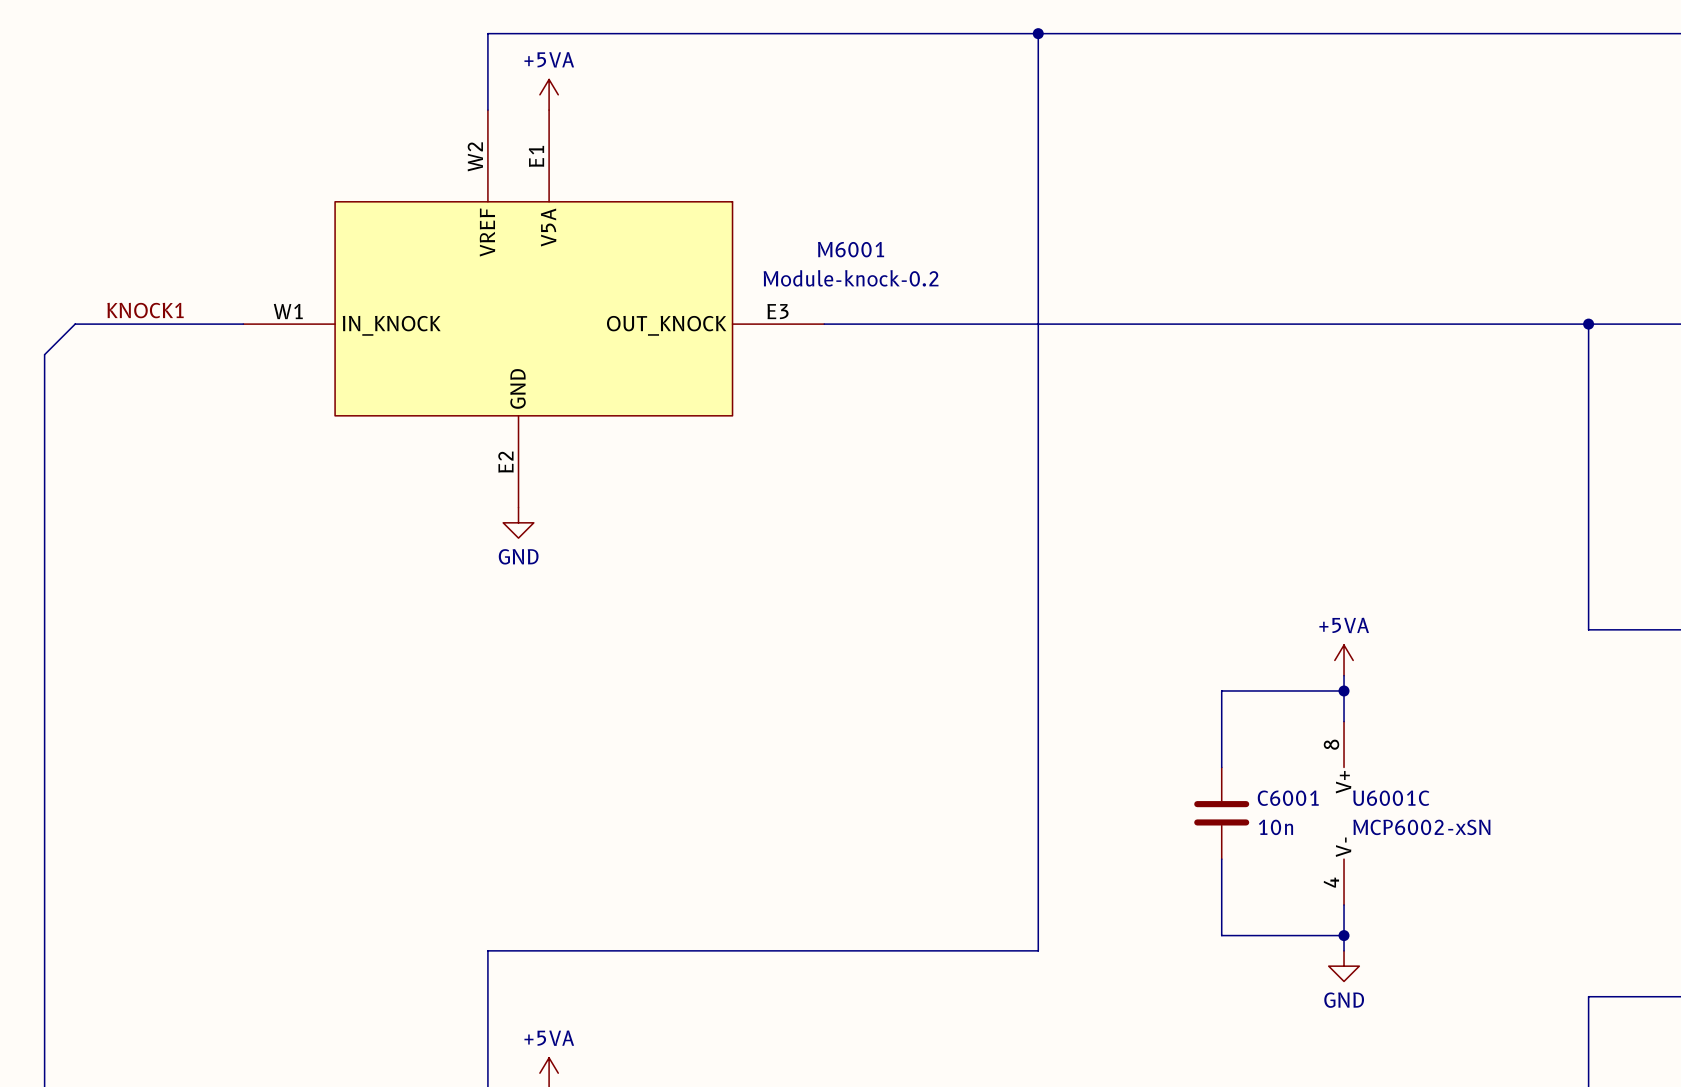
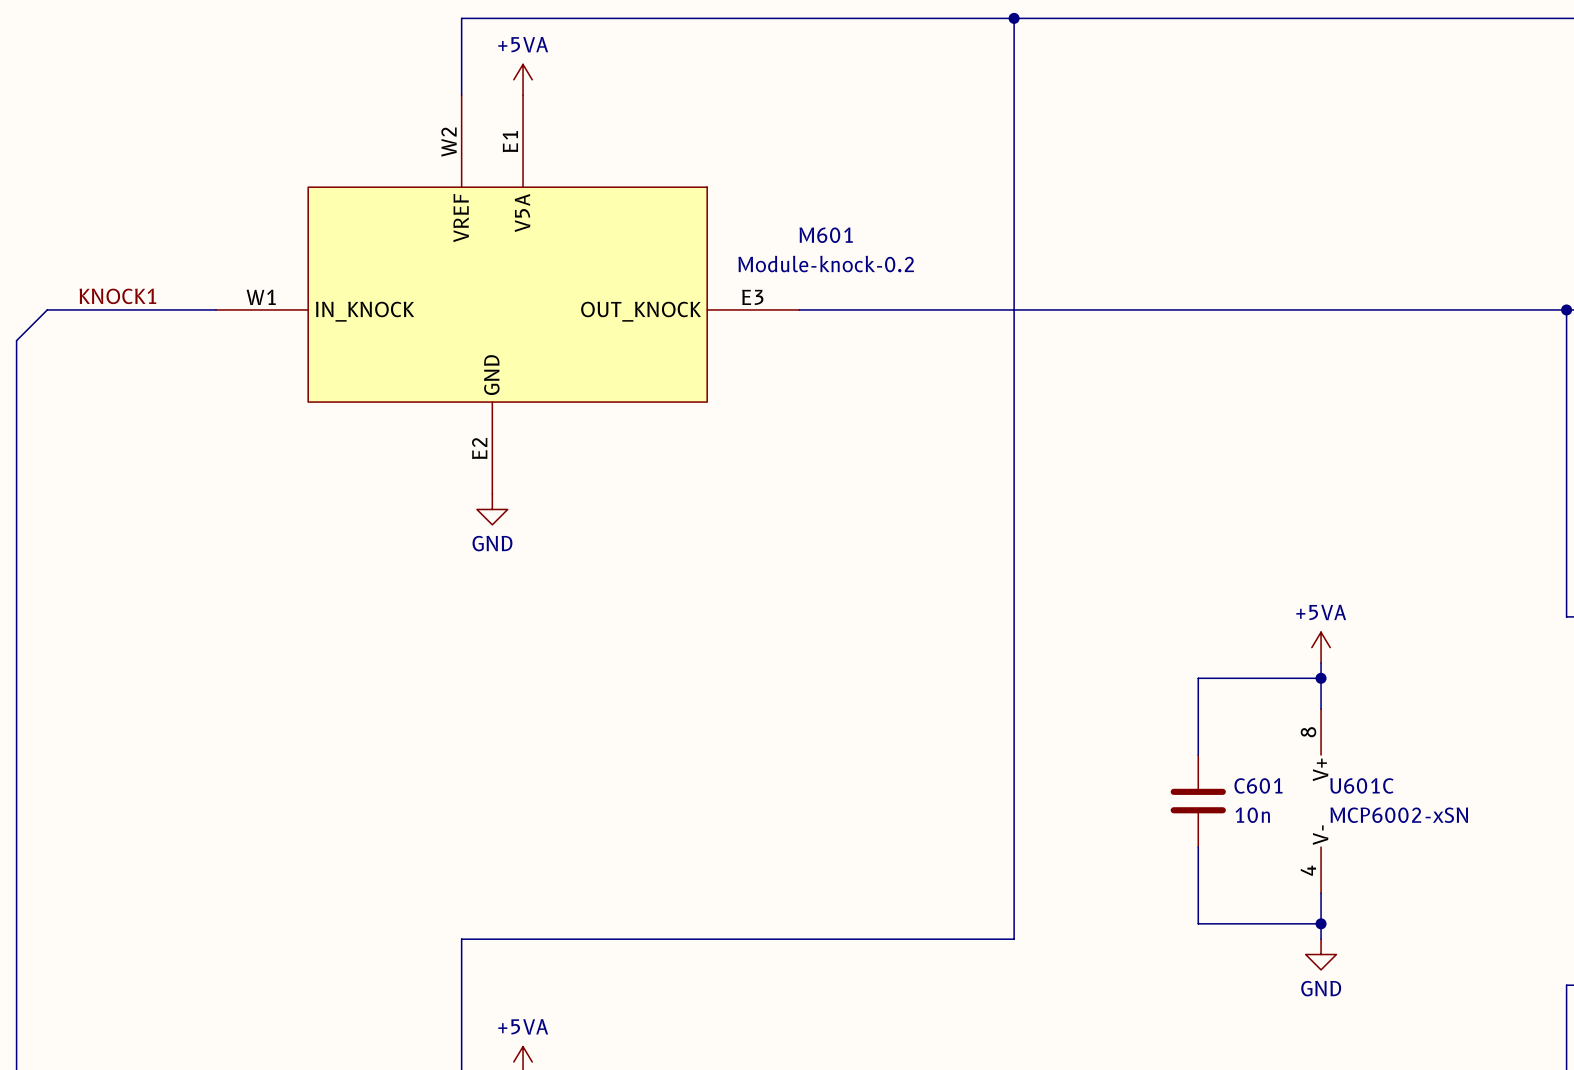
M6001 name: M6001 (851, 249) -> M601 (826, 235)
C6001 name: C6001 (1288, 798) -> C601 (1258, 785)
U6001C name: U6001C (1391, 798) -> U601C (1361, 785)

